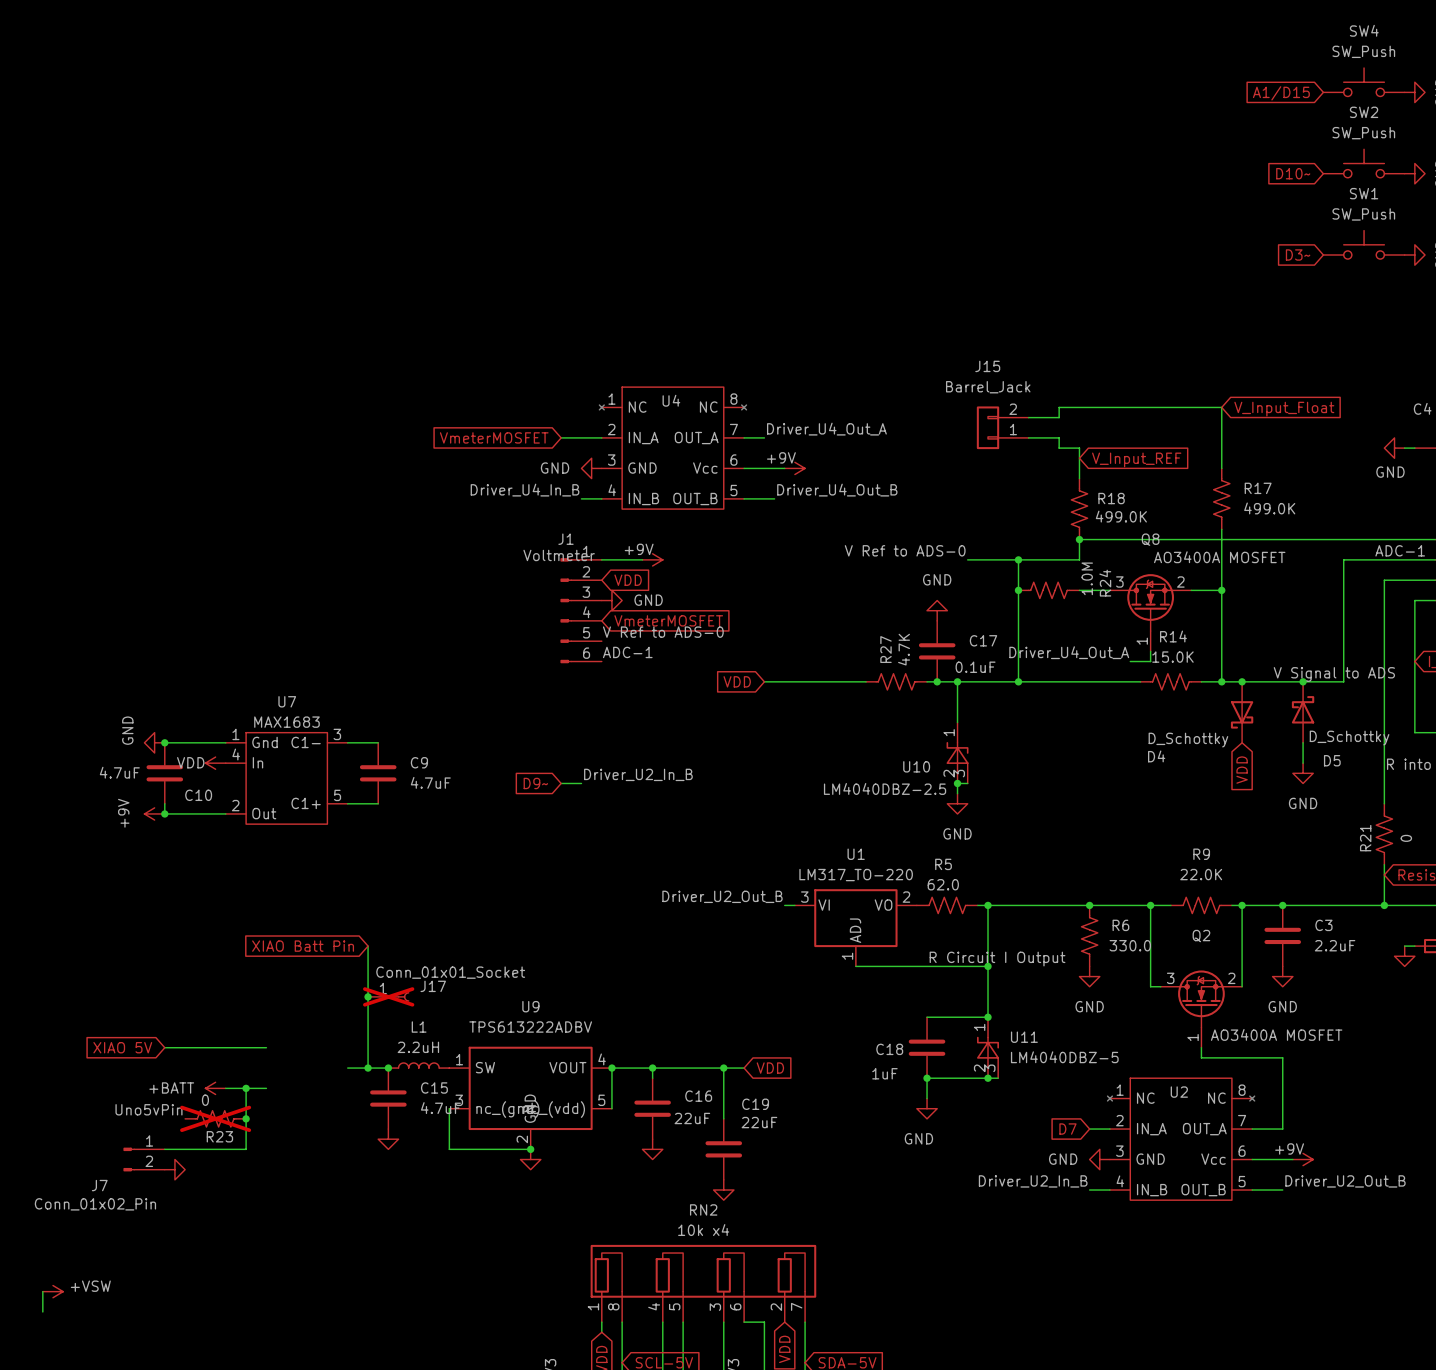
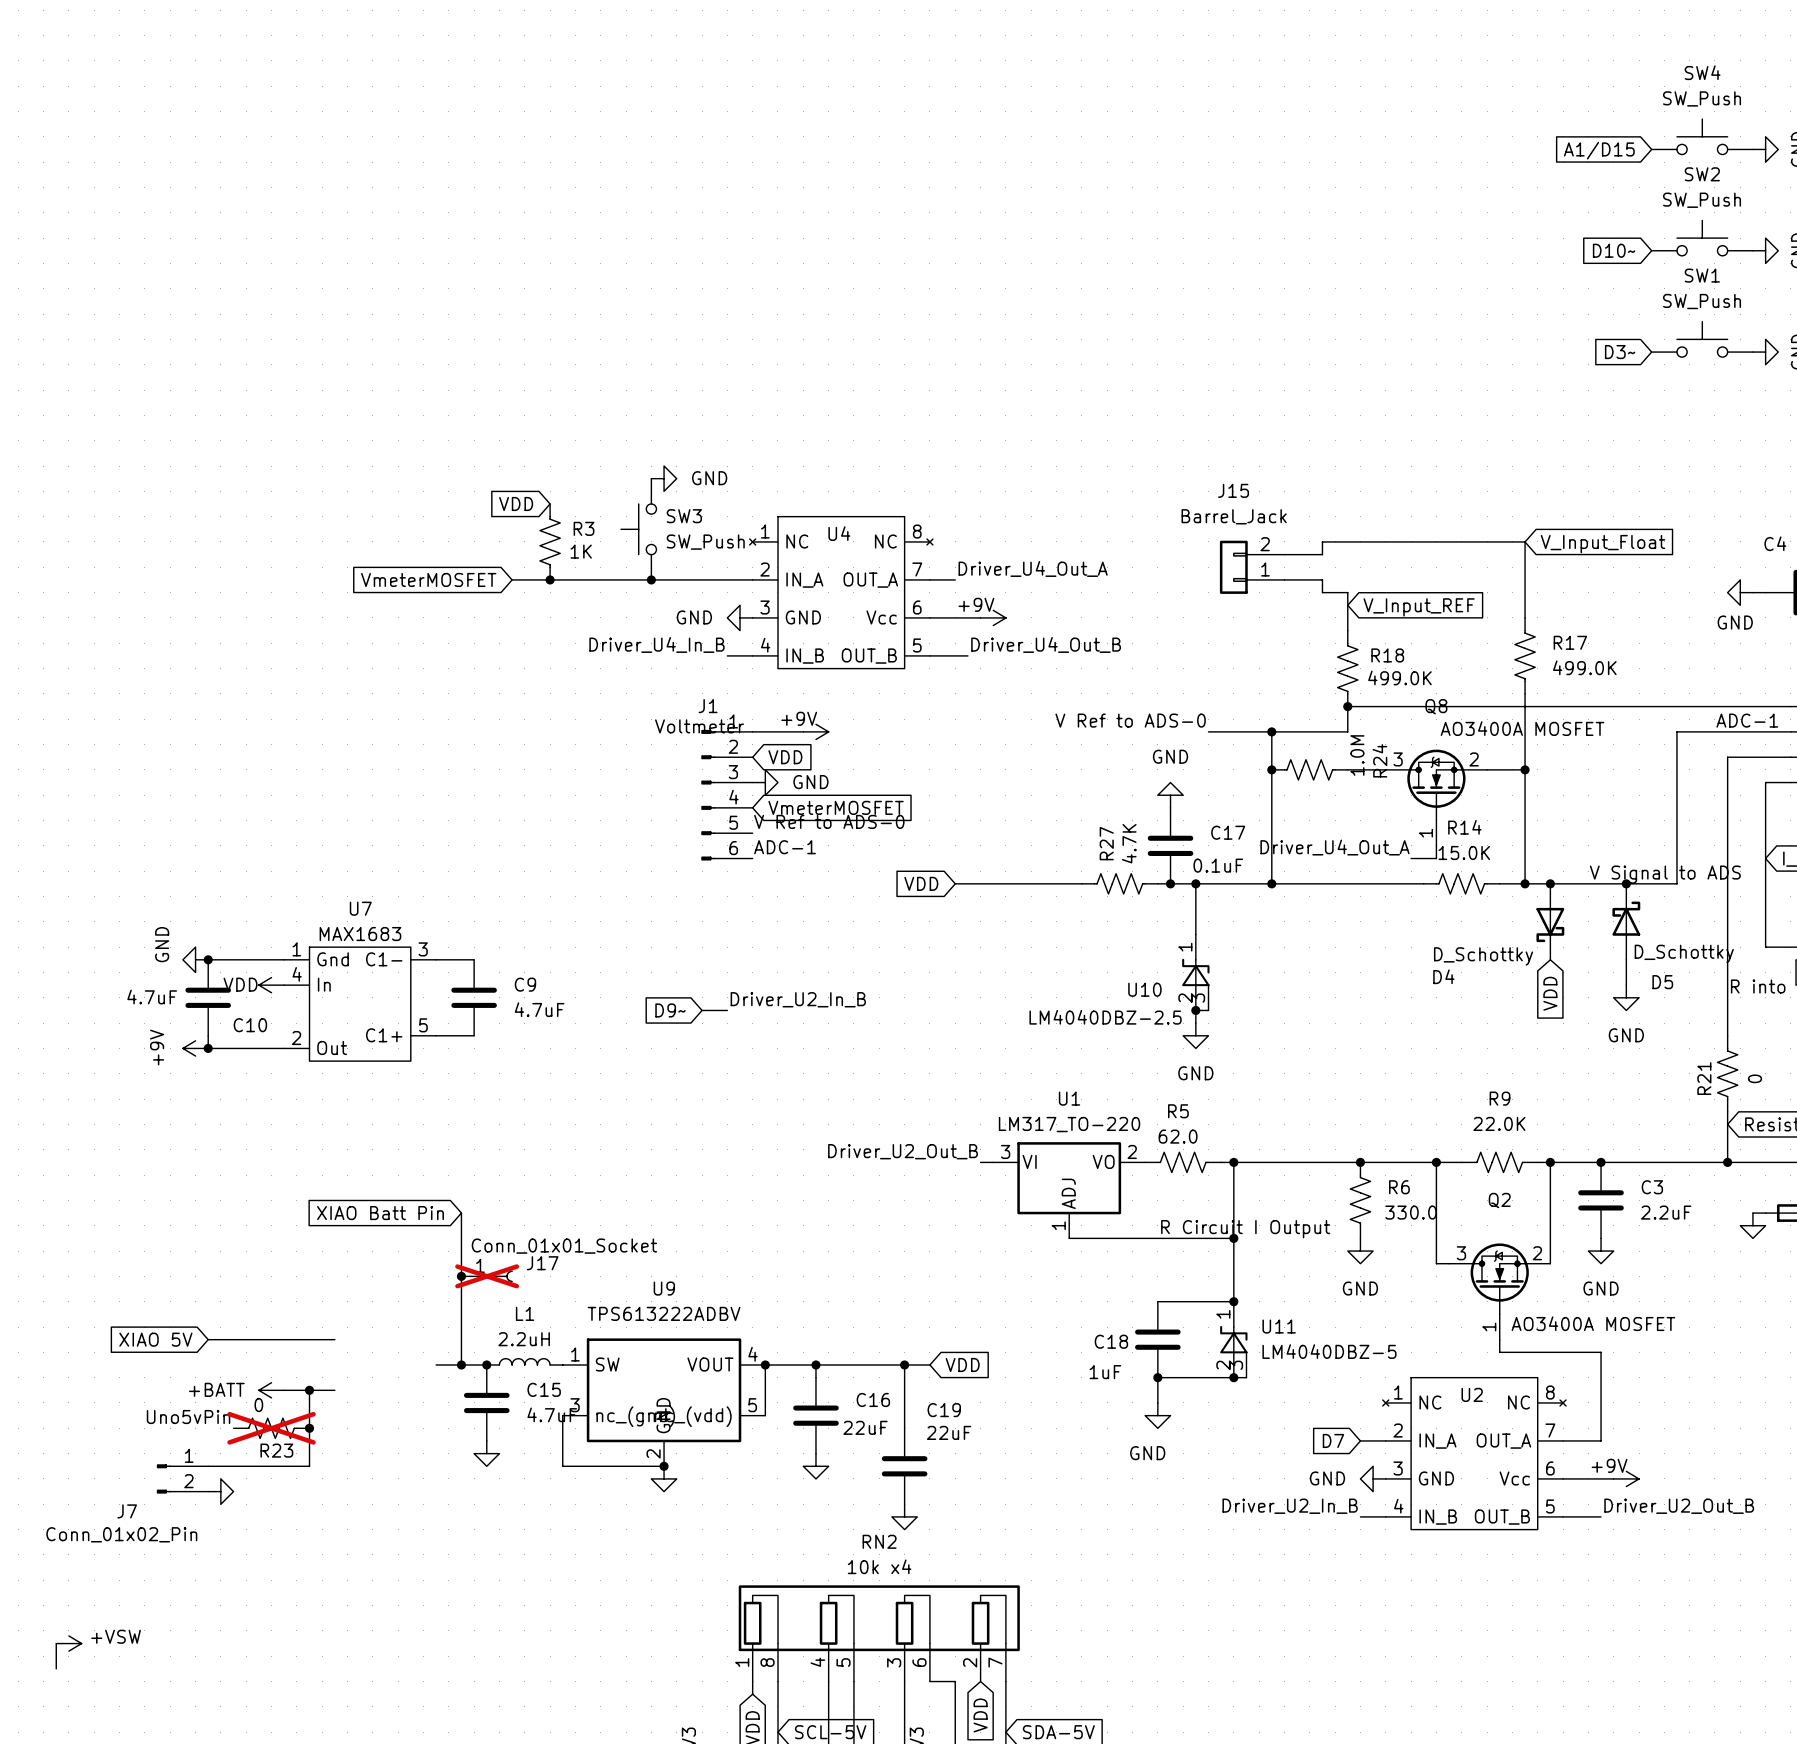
power symbol: none -> GND (664, 478)
global label: none -> VDD (516, 503)
SW3: none -> SW_Push (638, 529)
R3: none -> 1K (550, 541)
wire: none -> (512, 579) (702, 579)
junction: none -> (550, 579)
global label position: VmeterMOSFET (494, 437) -> VmeterMOSFET (428, 579)
junction: none -> (651, 579)

